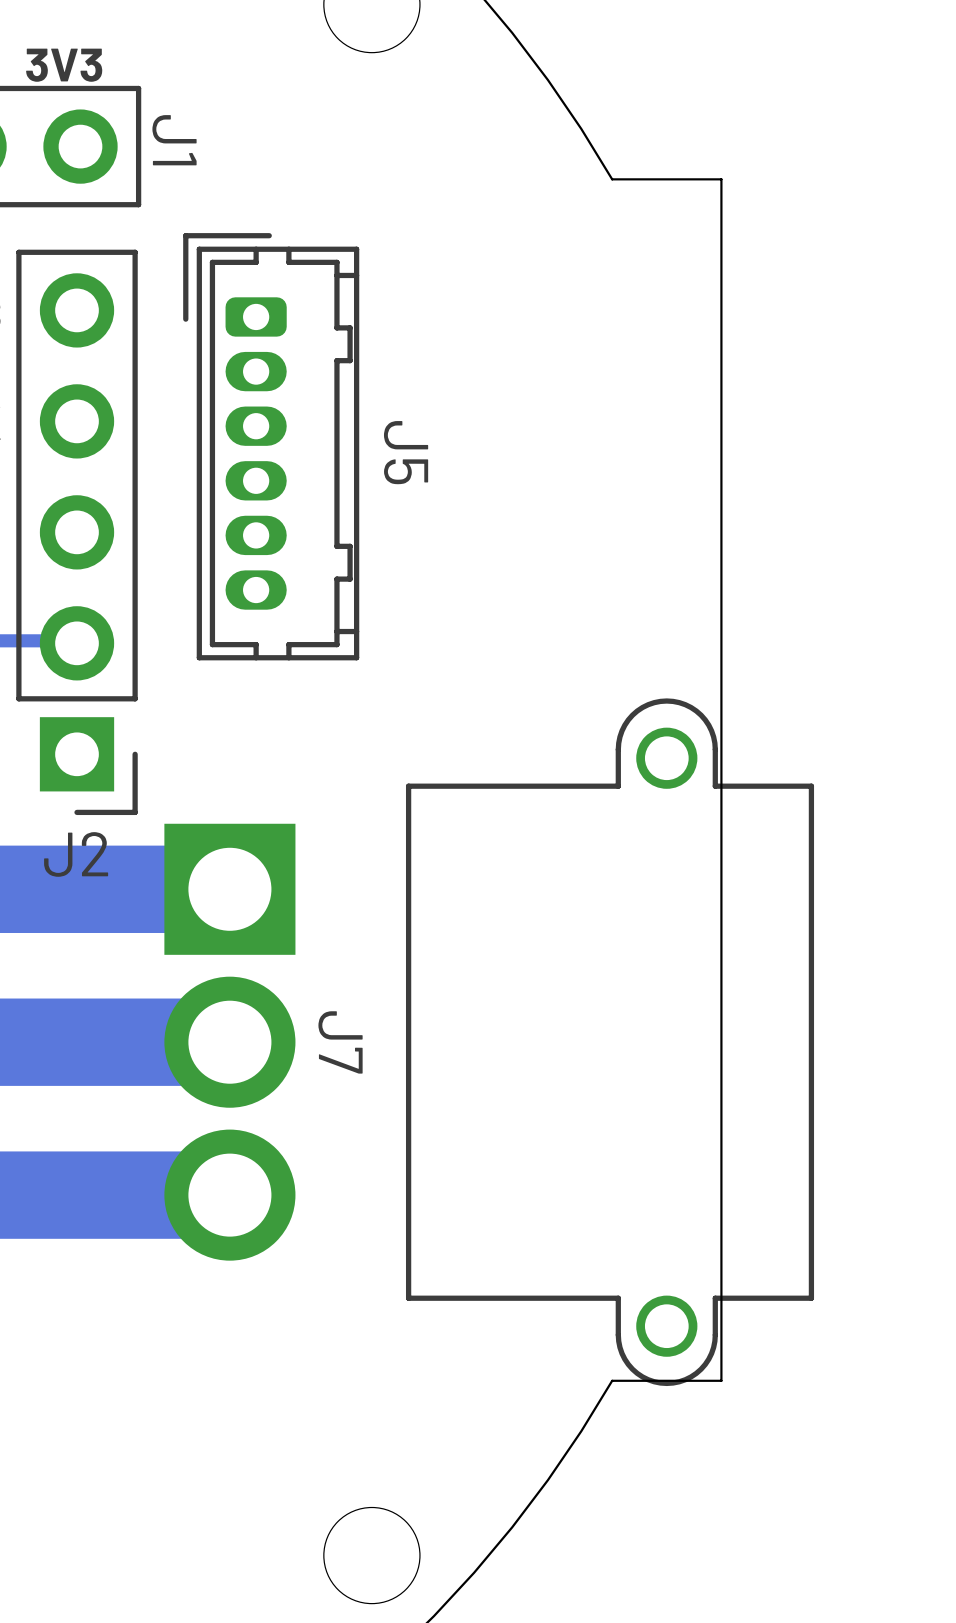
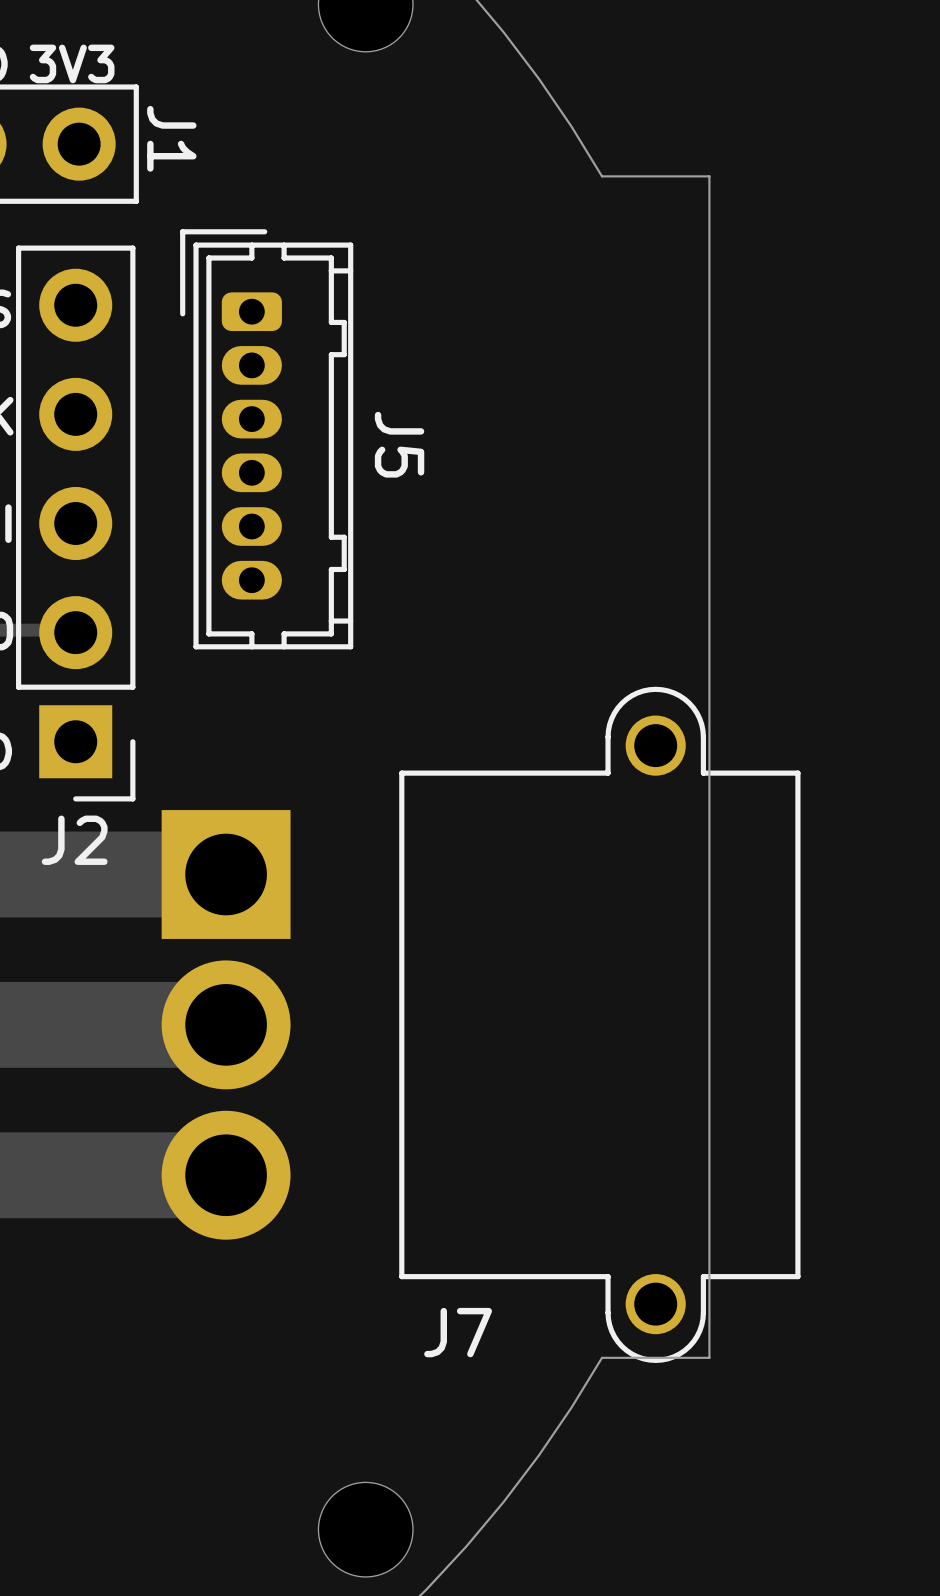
J7 name rotation: 0° (340, 1042) -> 90° counterclockwise (458, 1332)
J7 name position: J7 (340, 1042) -> J7 (458, 1332)

